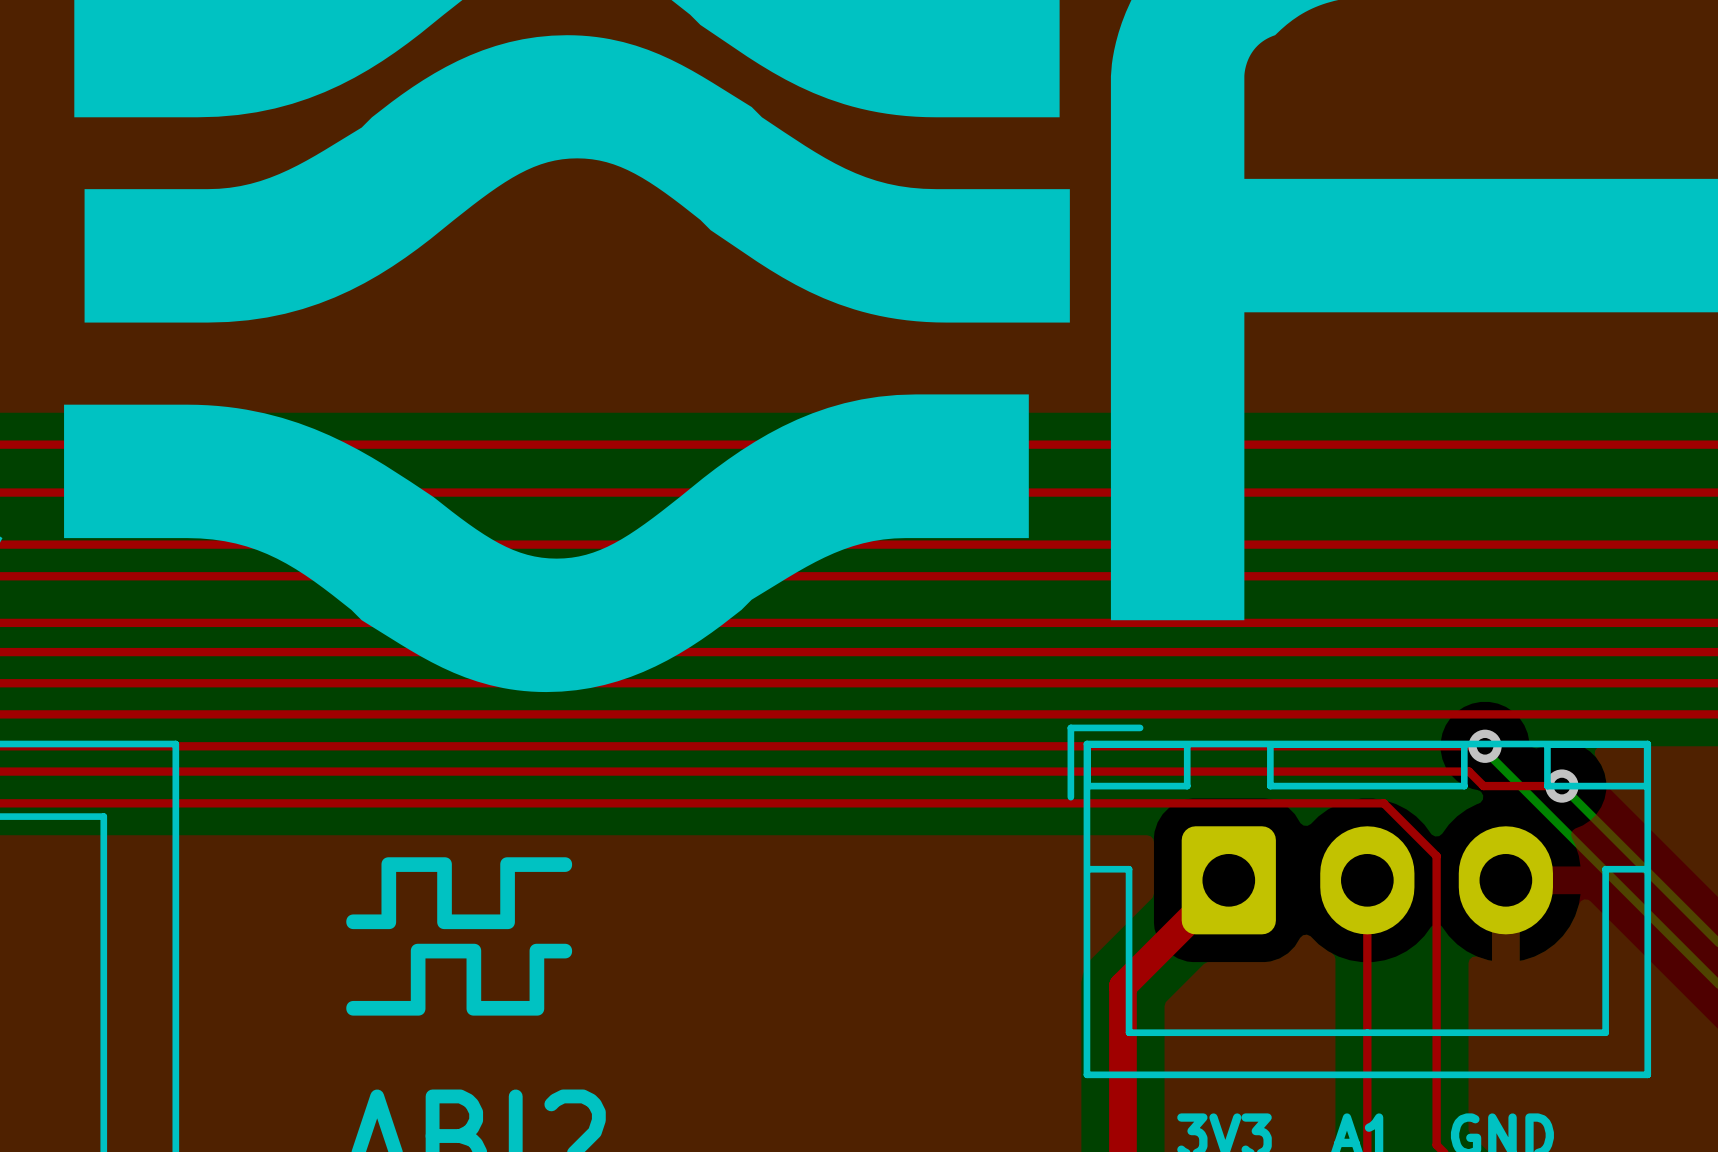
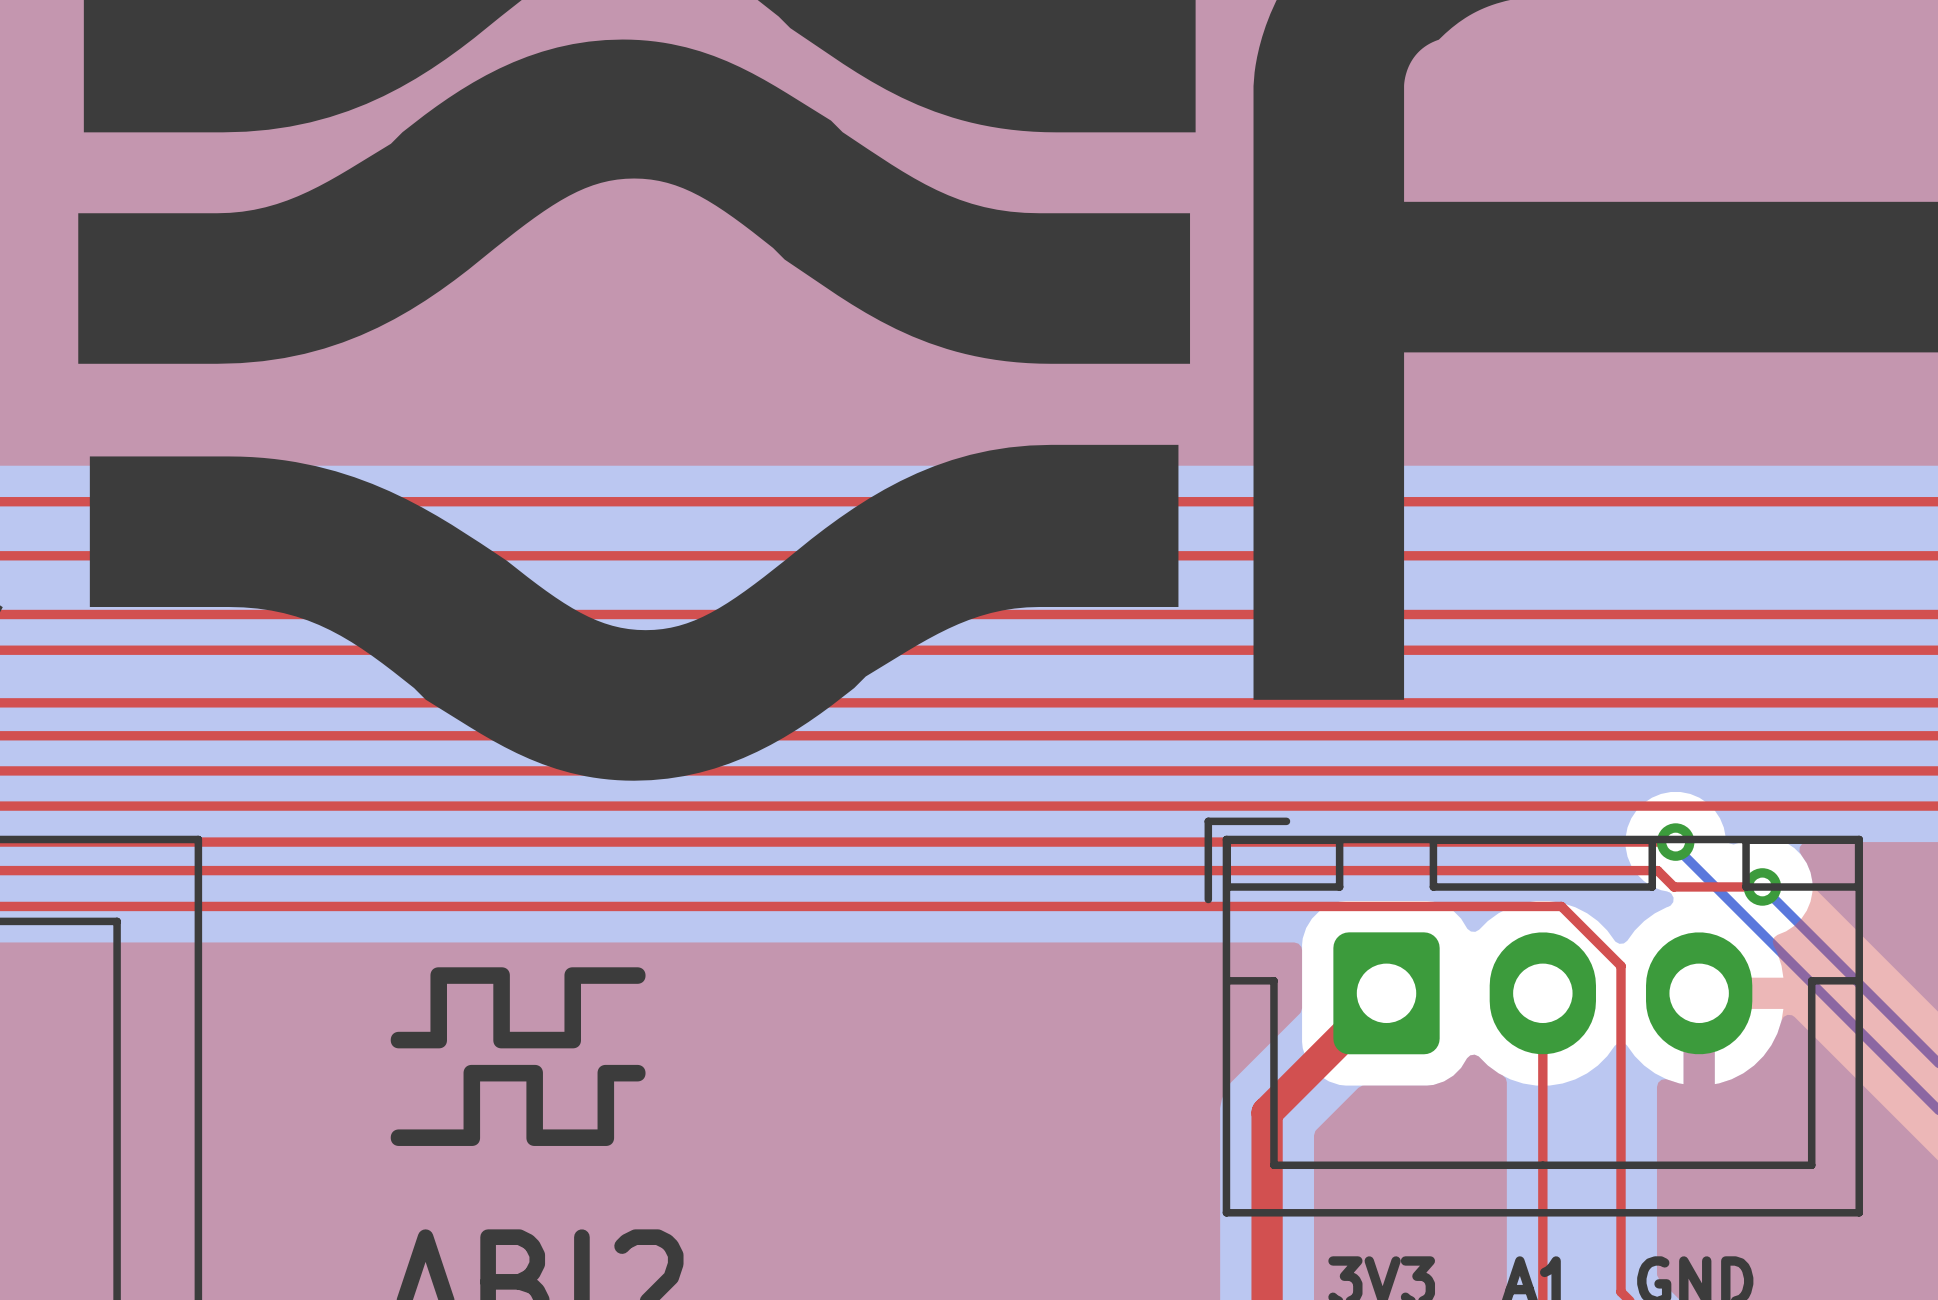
drawing position: (577, 178) -> (634, 201)
drawing position: (546, 543) -> (634, 612)

